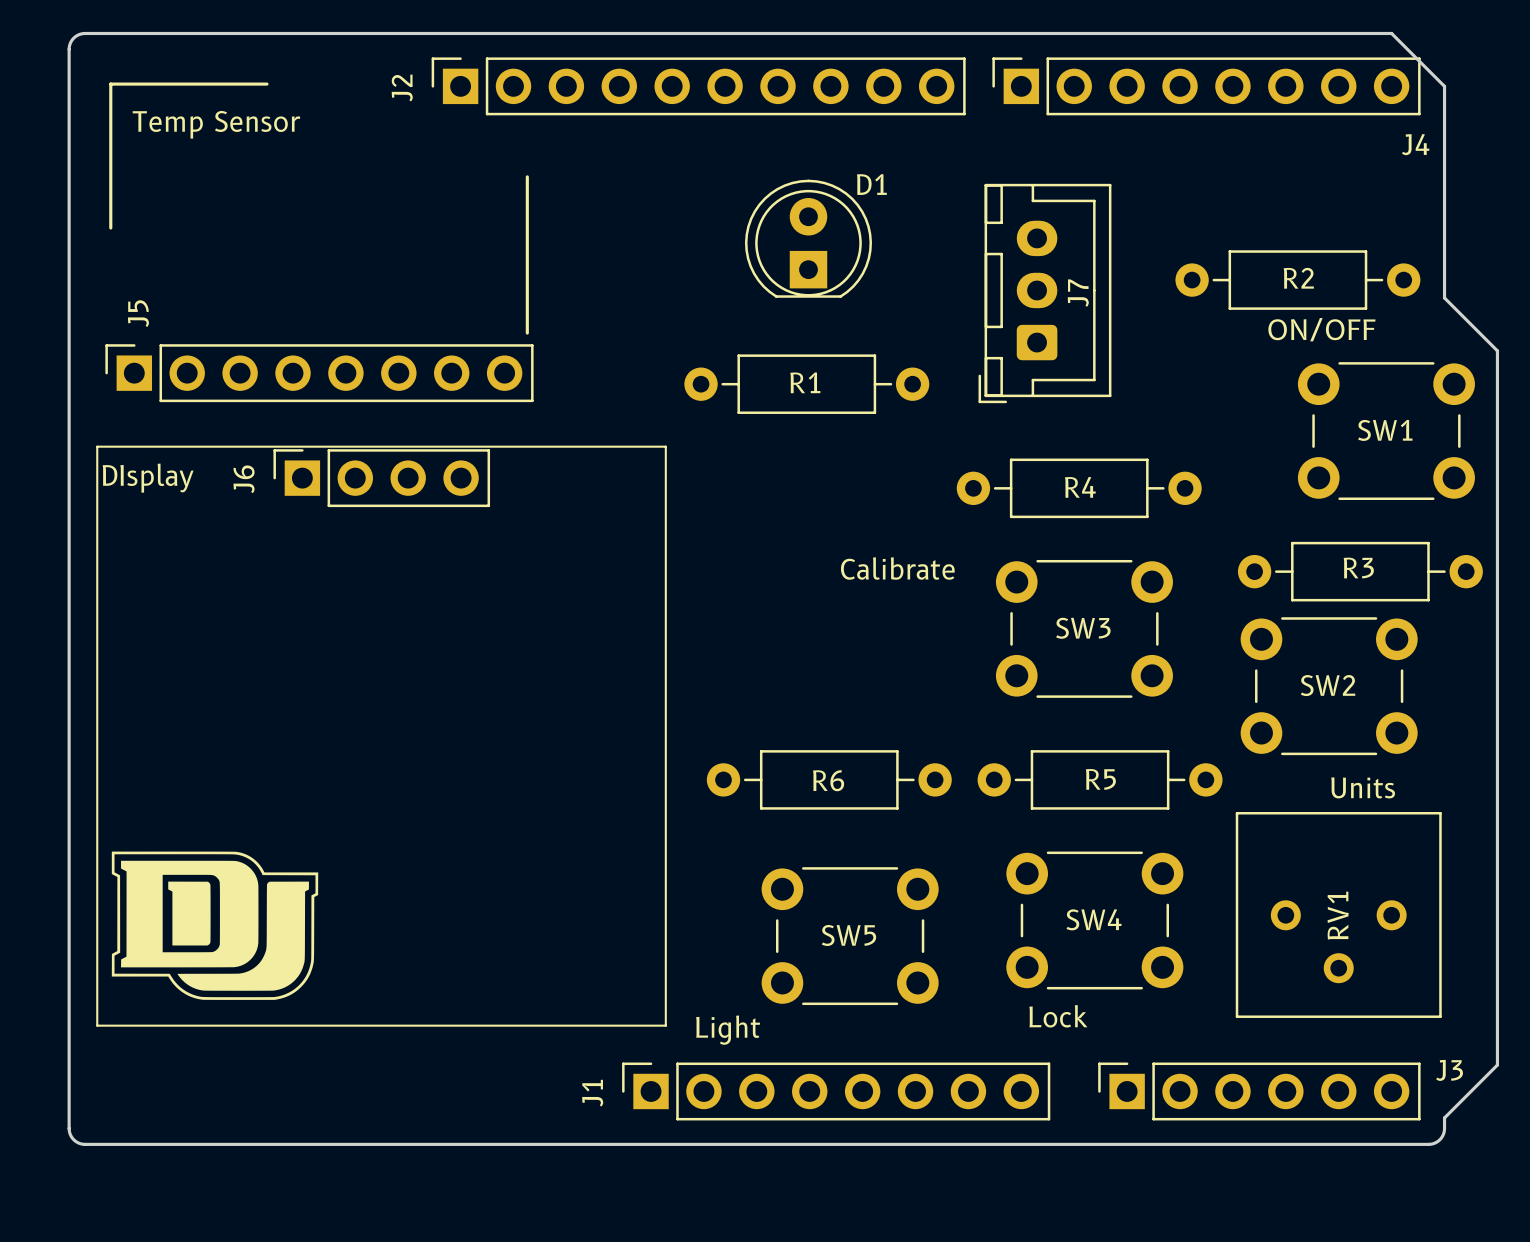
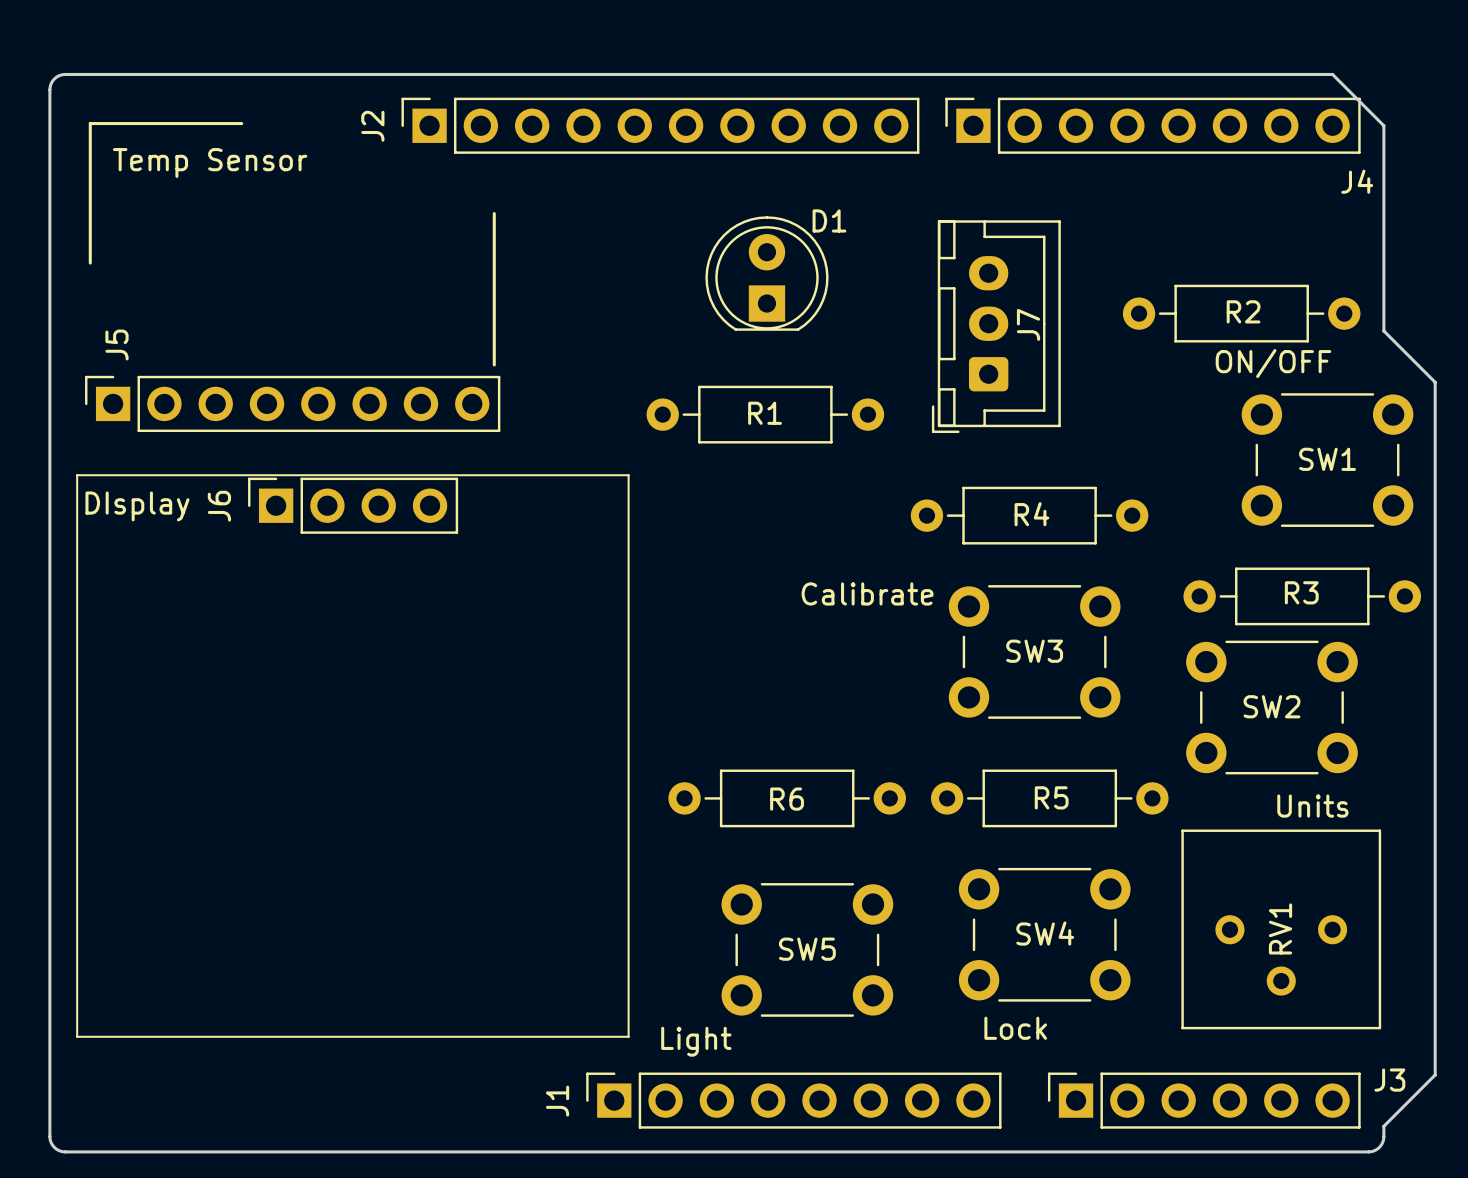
drawing: [111, 851, 319, 1000] -> none

